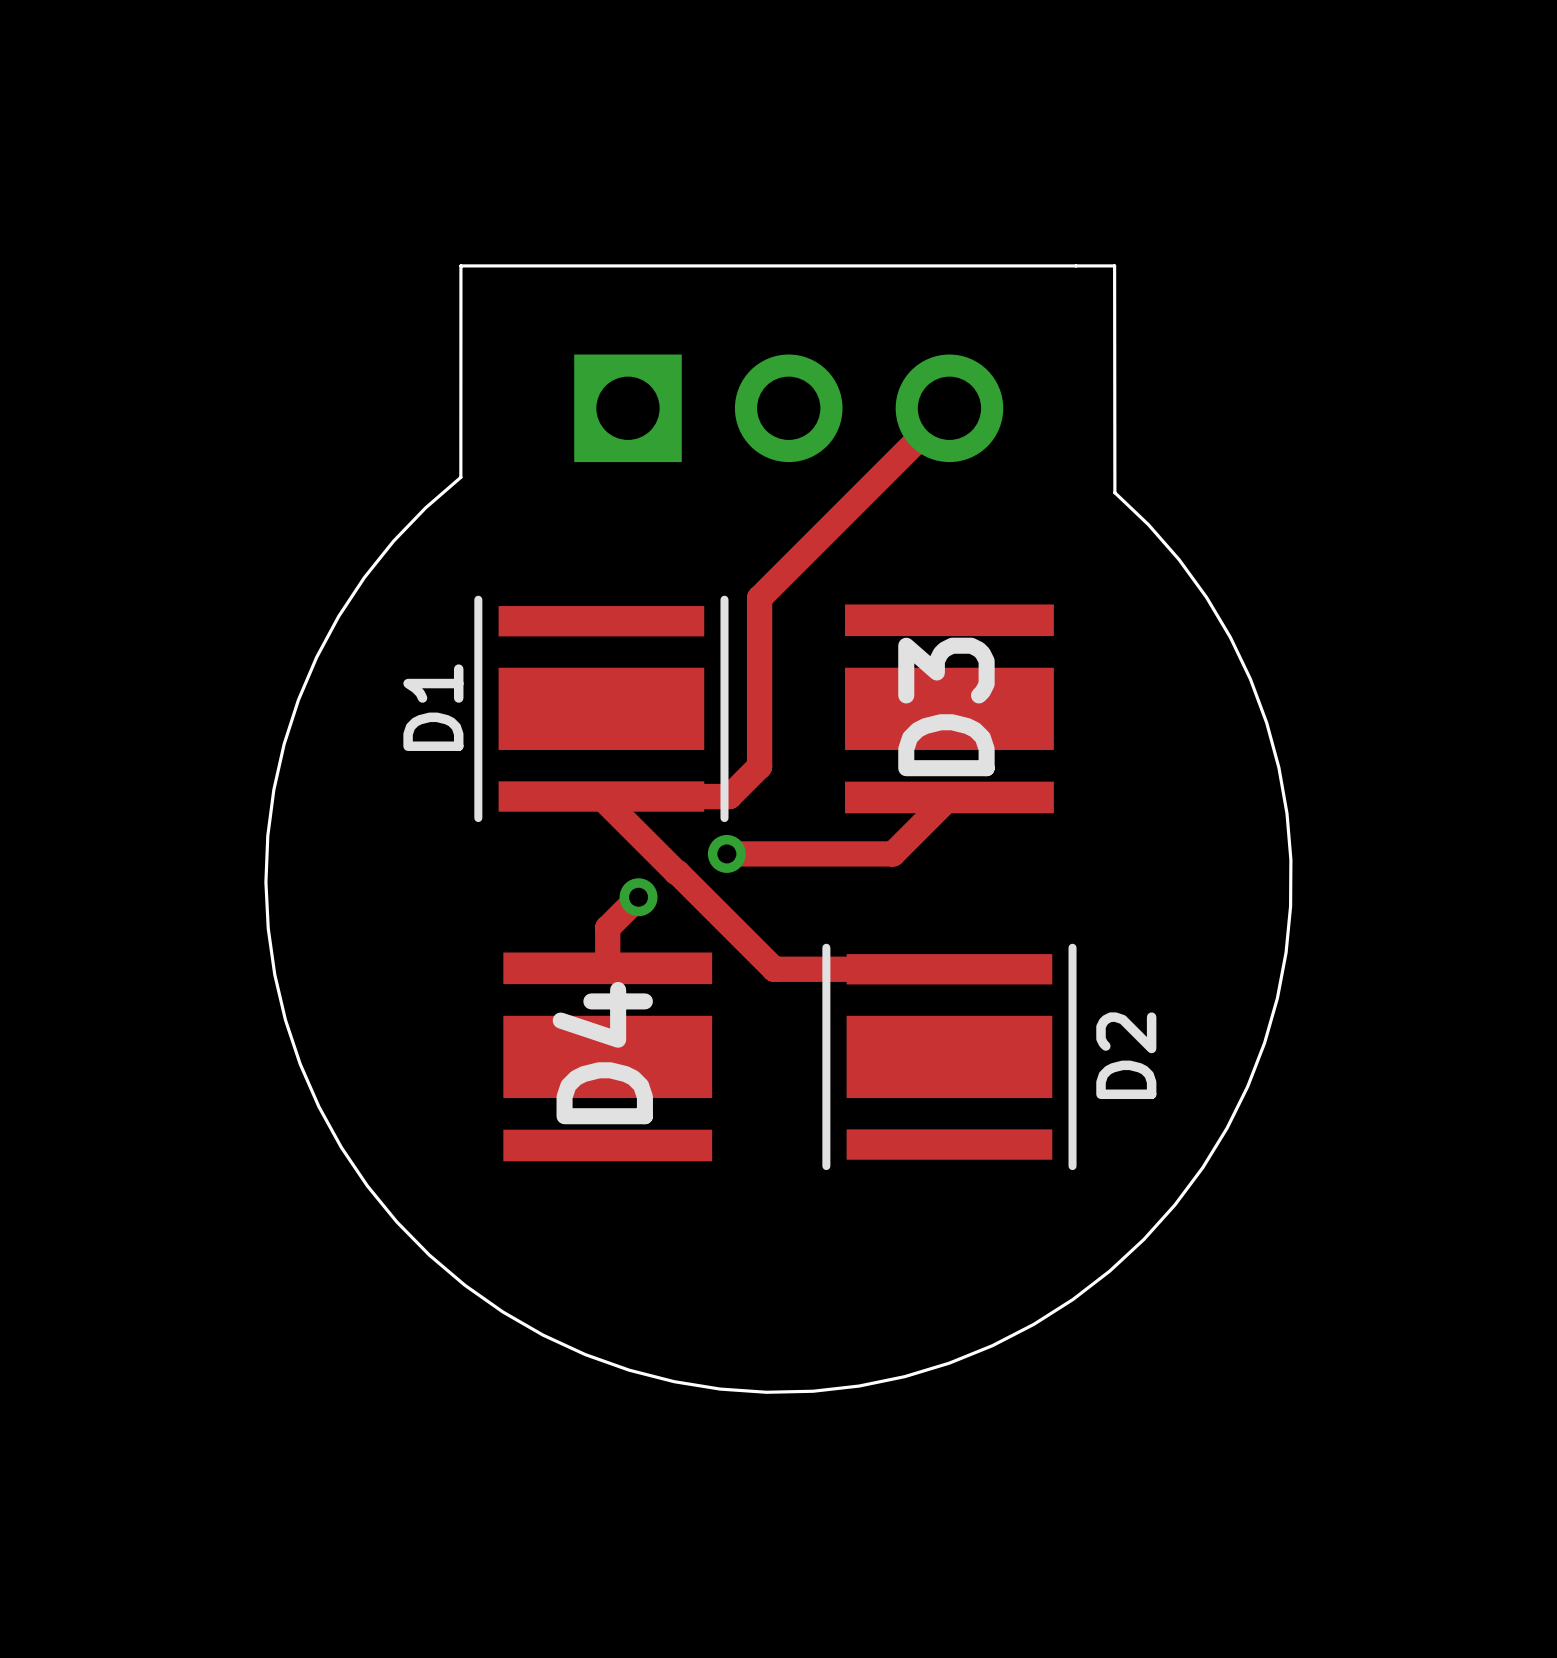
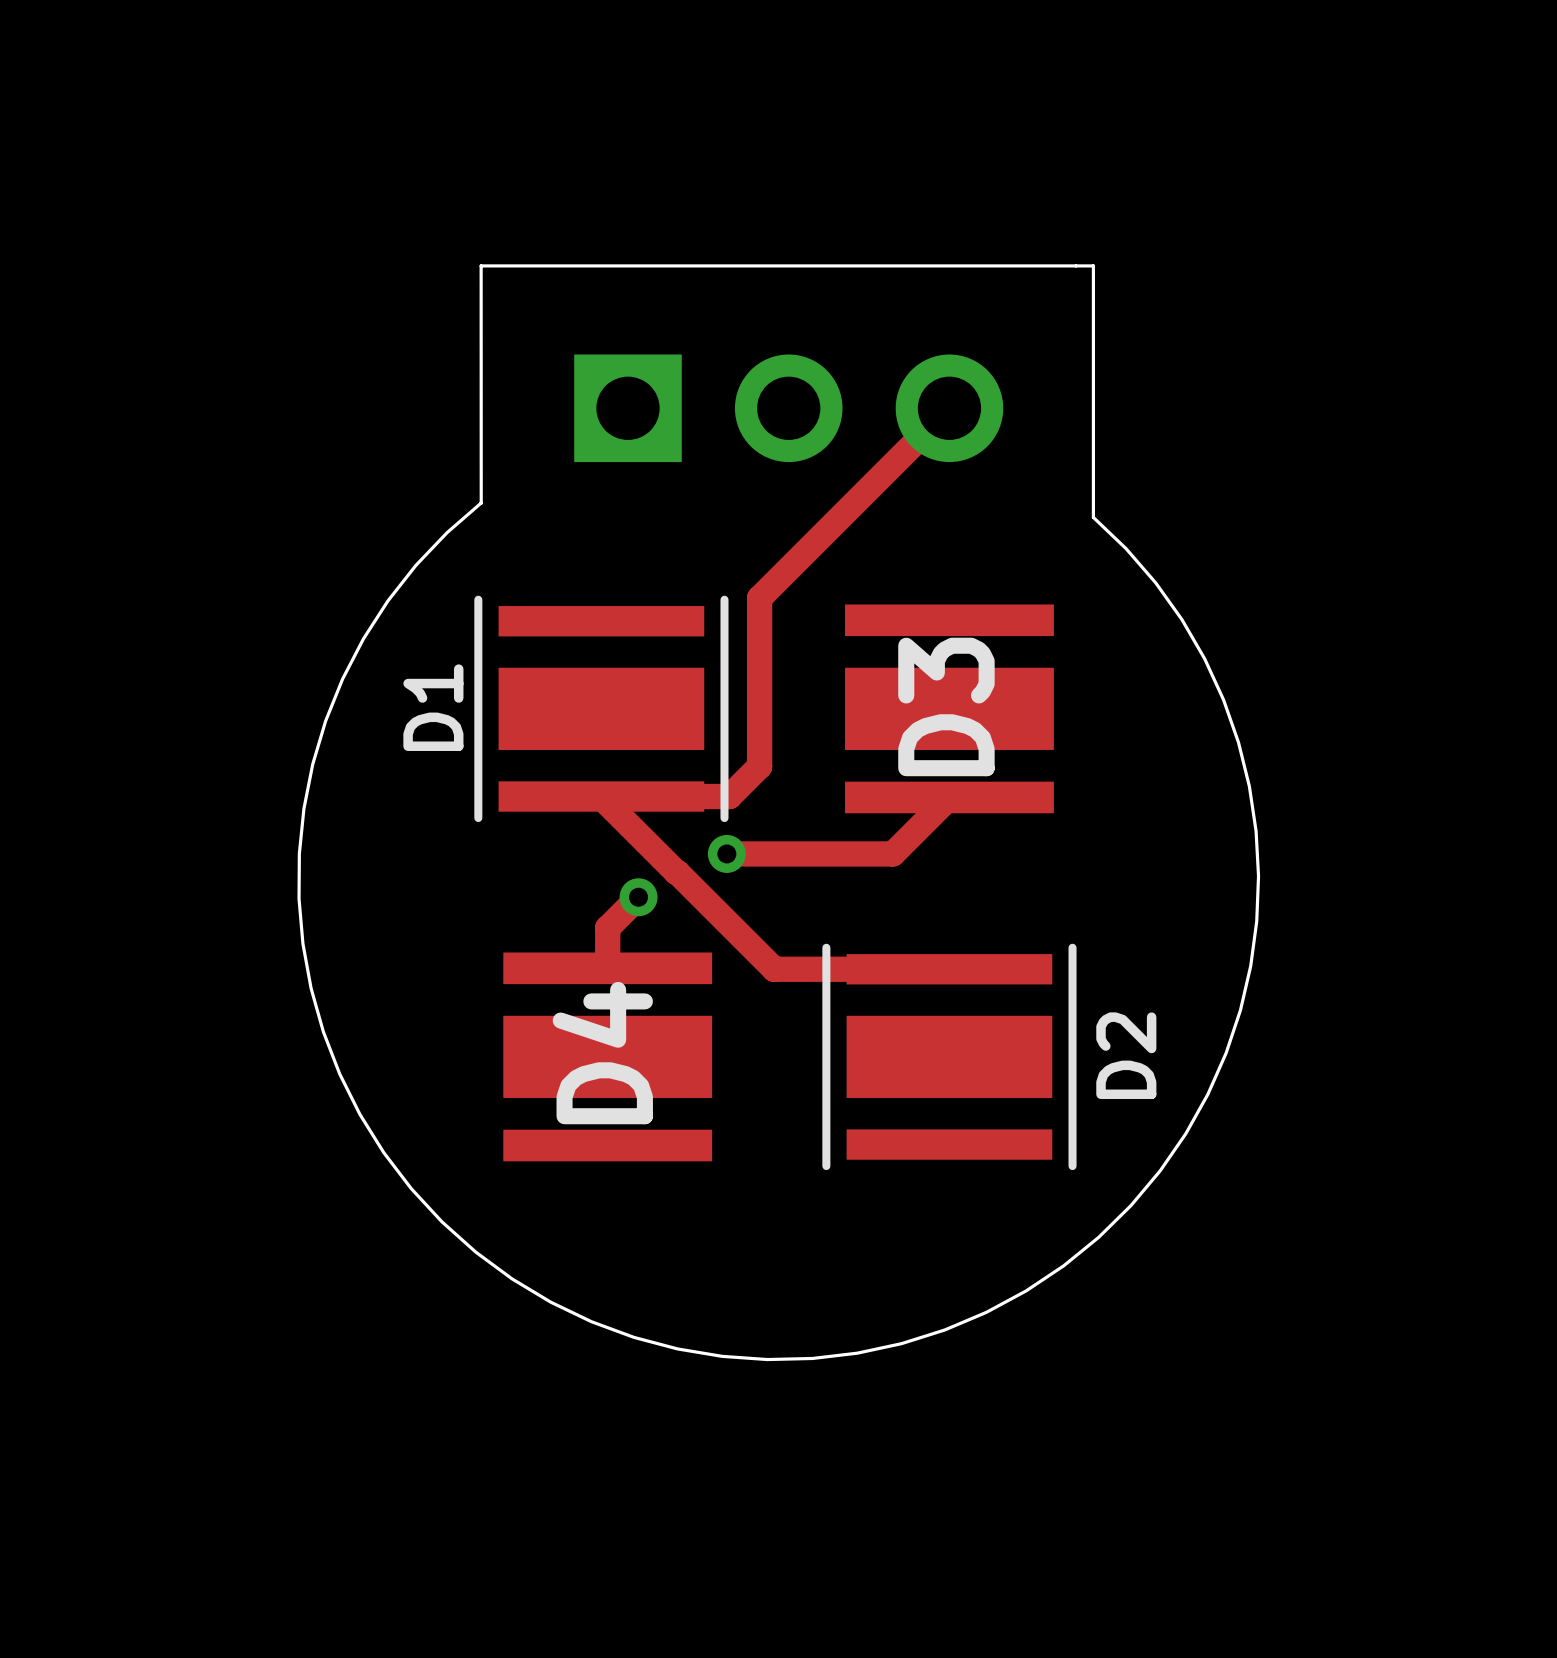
board edge: (481, 265) (460, 265) (460, 477) (425, 507) (393, 541) (364, 577) (338, 616) (316, 657) (298, 700) (284, 744) (273, 789) (267, 835) (265, 882) (268, 928) (274, 974) (285, 1019) (300, 1064) (318, 1106) (341, 1147) (367, 1185) (396, 1221) (429, 1255) (464, 1285) (502, 1311) (543, 1335) (585, 1354) (629, 1370) (674, 1381) (720, 1389) (766, 1392) (813, 1391) (859, 1386) (904, 1376) (949, 1363) (992, 1345) (1033, 1324) (1072, 1299) (1109, 1271) (1143, 1239) (1174, 1204) (1202, 1167) (1227, 1128) (1247, 1086) (1264, 1042) (1277, 998) (1286, 952) (1290, 906) (1290, 859) (1286, 813) (1278, 767) (1266, 722) (1250, 679) (1230, 637) (1206, 597) (1179, 559) (1148, 524) (1114, 492) (1114, 265) (1093, 265) -> (481, 265) (481, 503) (447, 532) (415, 565) (387, 600) (363, 638) (342, 679) (325, 721) (312, 764) (303, 808) (299, 853) (299, 898) (302, 943) (311, 988) (323, 1031) (339, 1073) (359, 1114) (383, 1152) (411, 1188) (442, 1221) (475, 1252) (512, 1278) (550, 1302) (591, 1321) (633, 1337) (677, 1348) (722, 1356) (767, 1359) (812, 1358) (857, 1353) (901, 1343) (944, 1330) (986, 1312) (1026, 1290) (1063, 1265) (1098, 1237) (1130, 1205) (1160, 1170) (1185, 1133) (1207, 1094) (1226, 1053) (1240, 1010) (1250, 966) (1256, 921) (1258, 876) (1256, 831) (1249, 786) (1238, 742) (1223, 699) (1204, 658) (1181, 619) (1155, 582) (1126, 548) (1093, 517) (1093, 265)

